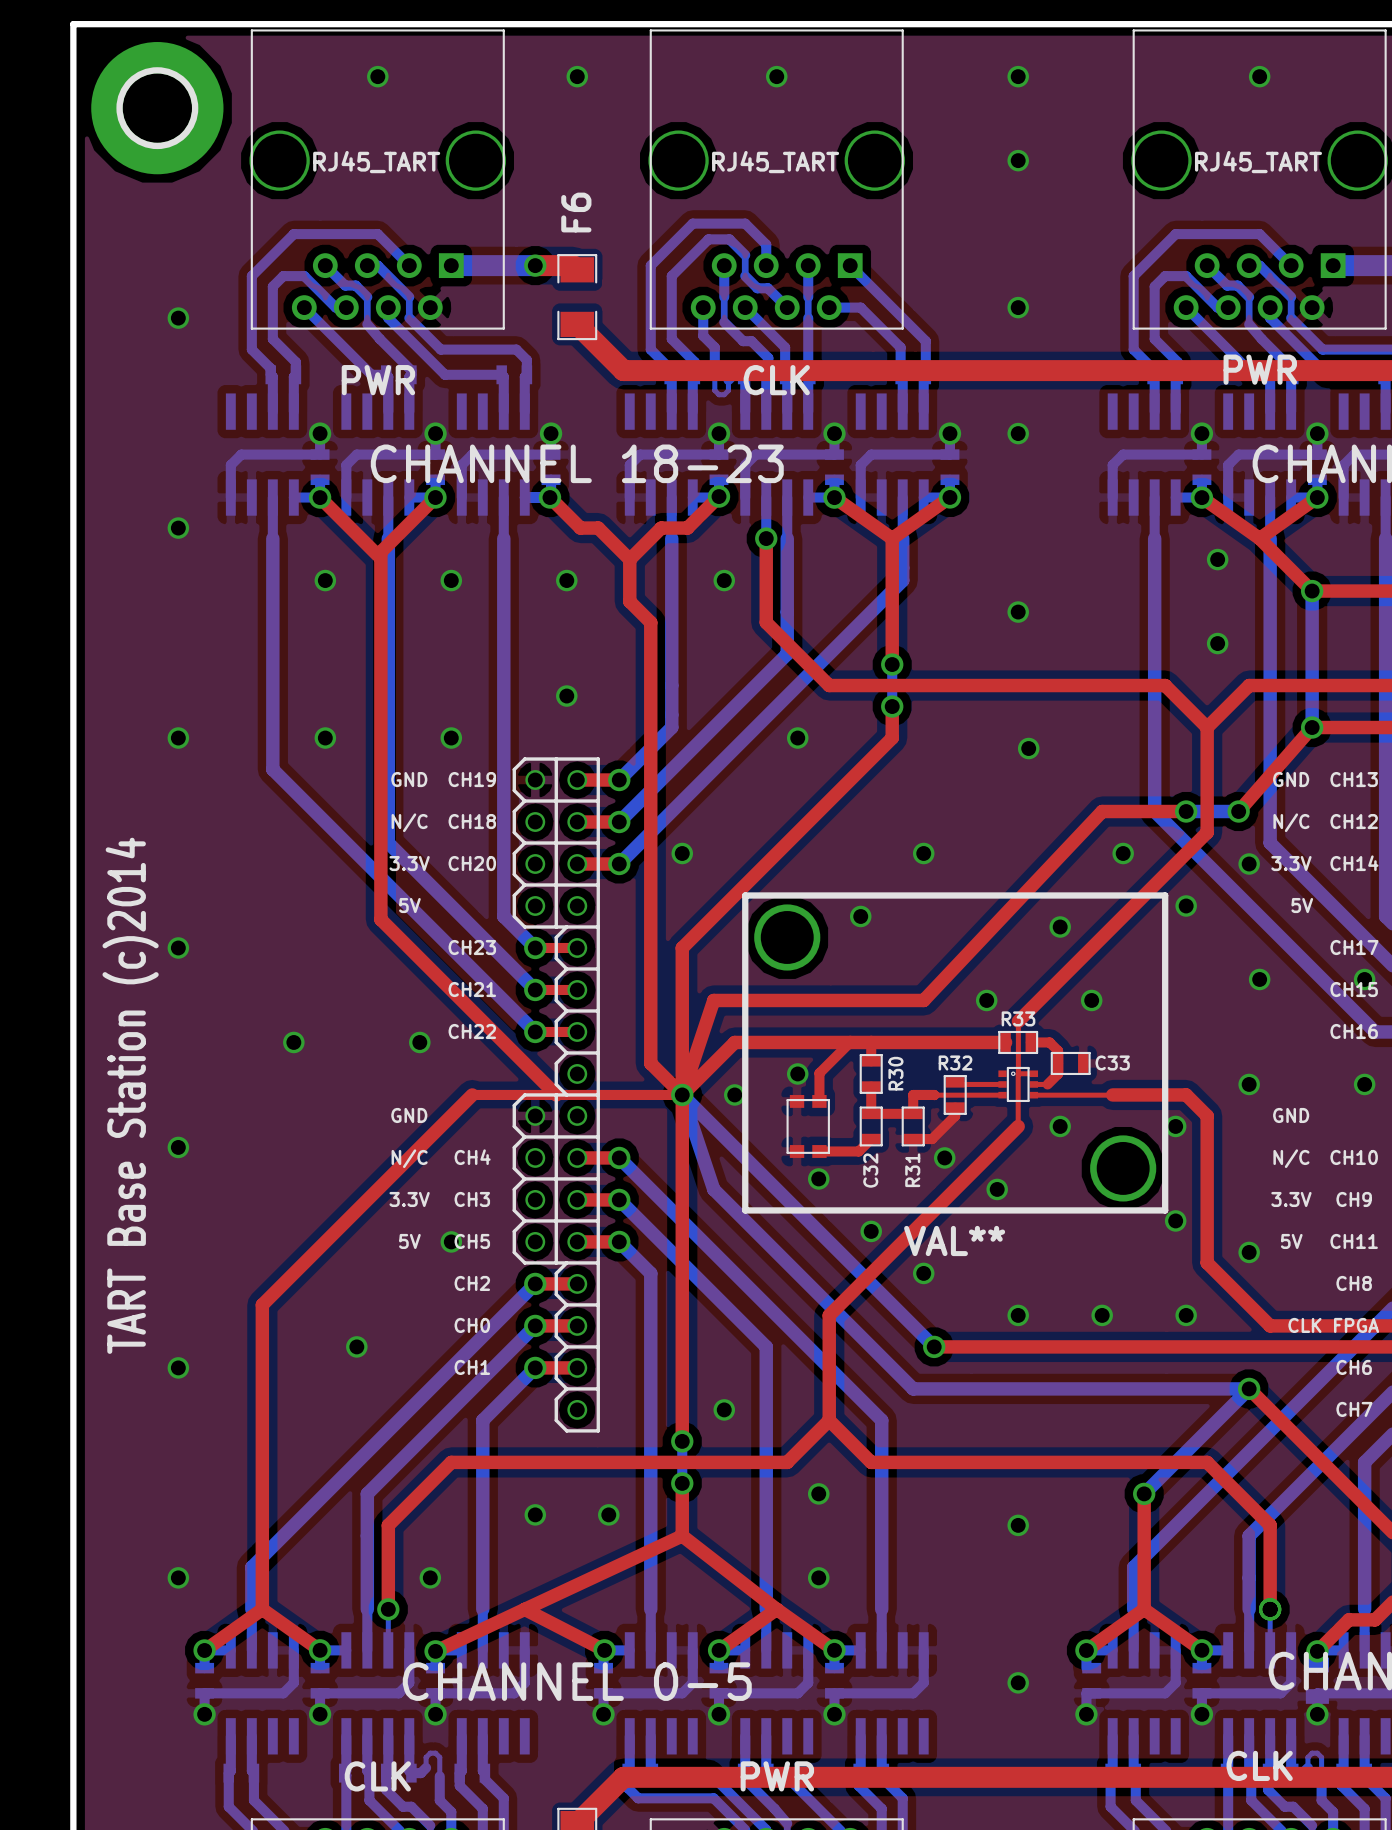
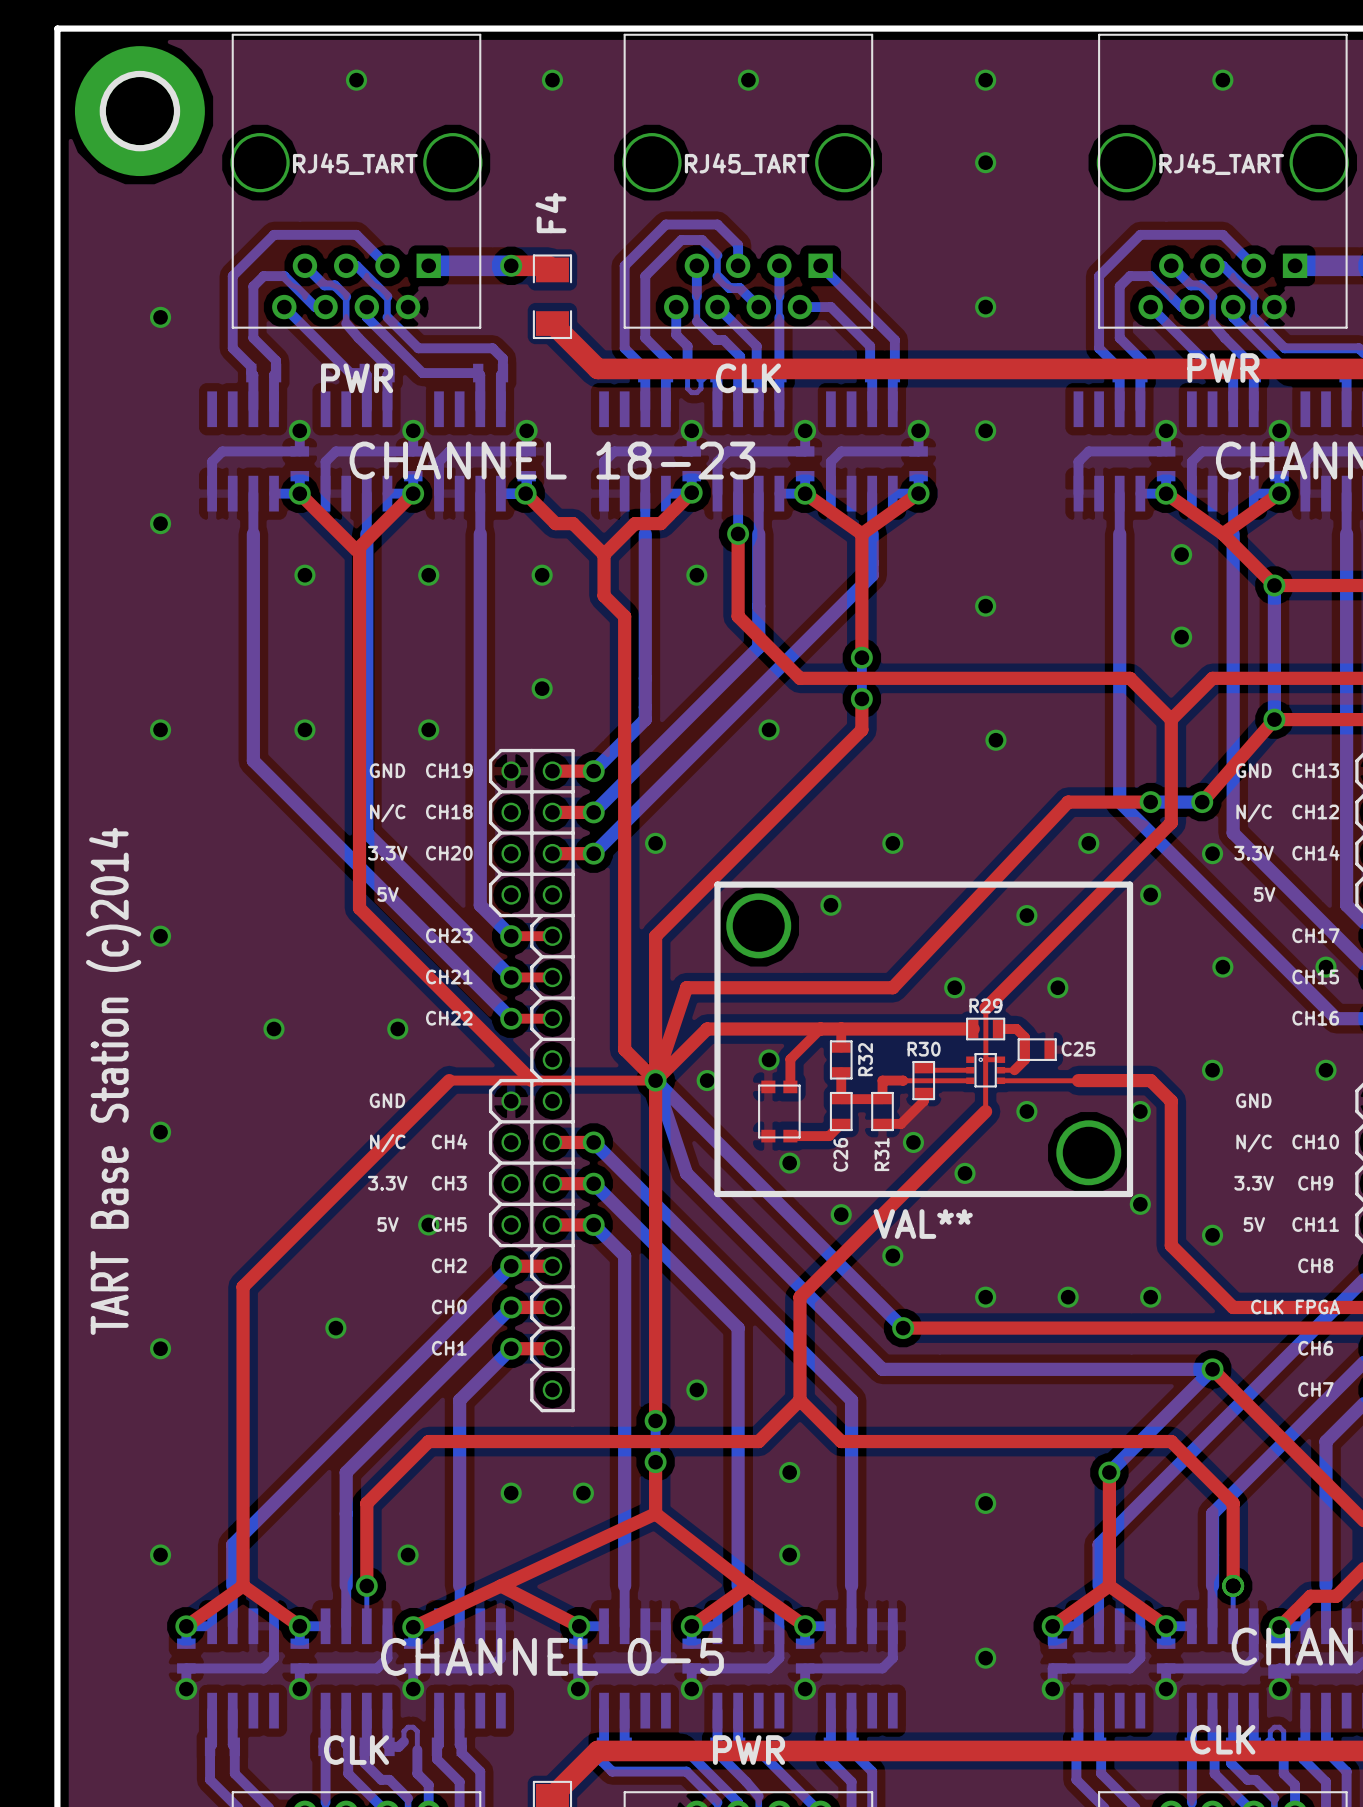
F6 name: F6 (576, 212) -> F4 (550, 213)
R33 name: R33 (1018, 1018) -> R29 (985, 1005)
R32 name: R32 (955, 1062) -> R30 (924, 1049)
C33 name: C33 (1112, 1062) -> C25 (1078, 1049)
R30 name: R30 (895, 1073) -> R32 (865, 1059)
C32 name: C32 (870, 1170) -> C26 (840, 1154)

